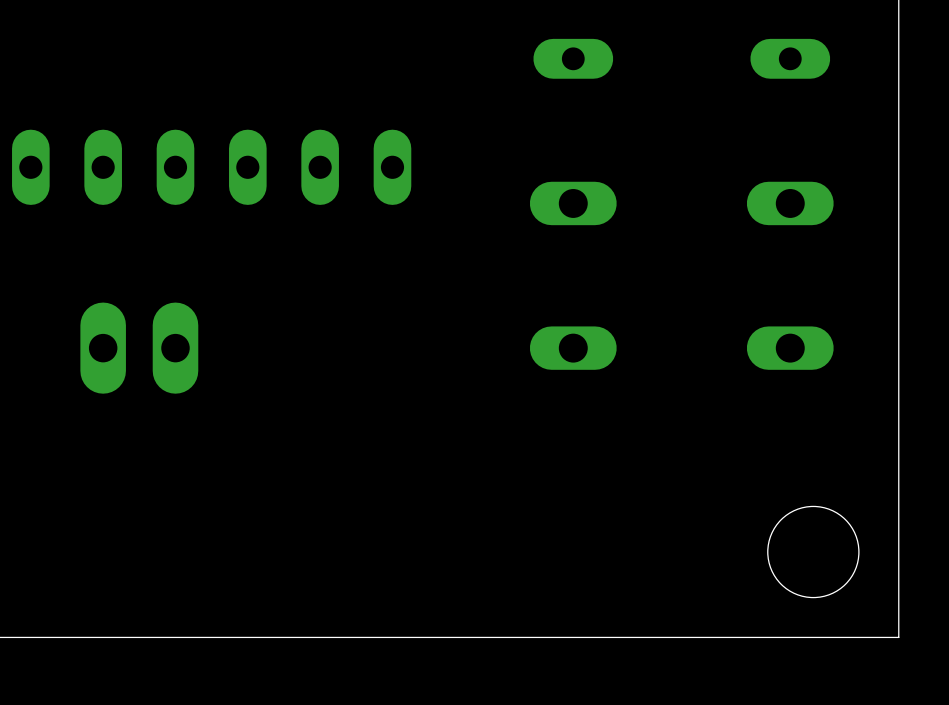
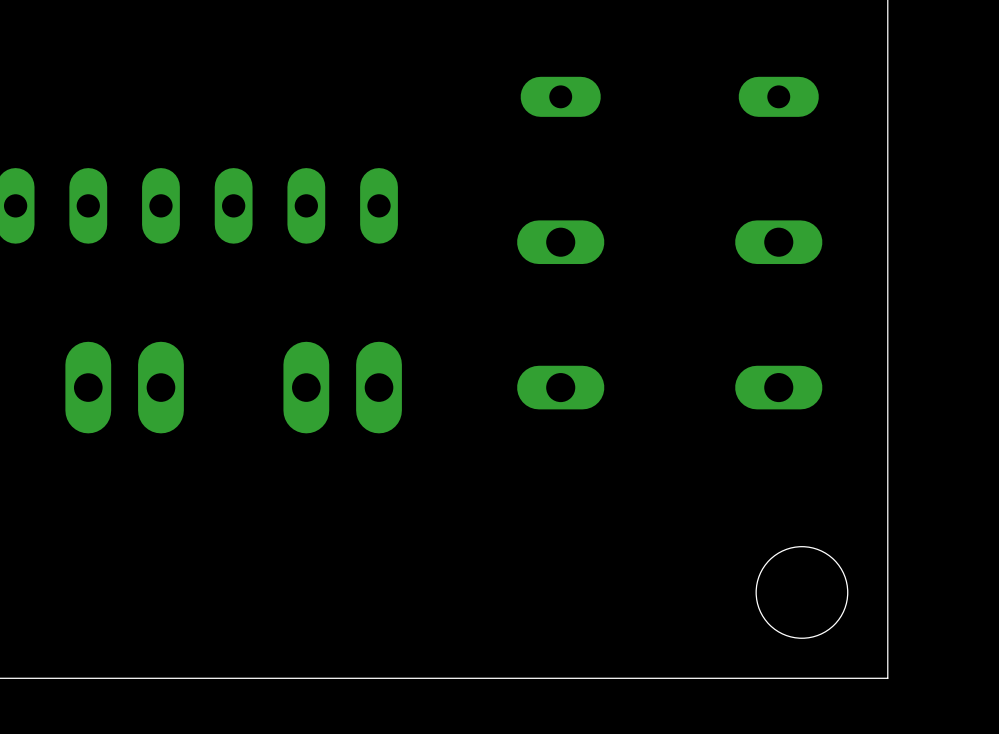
part: none -> (342, 387)

